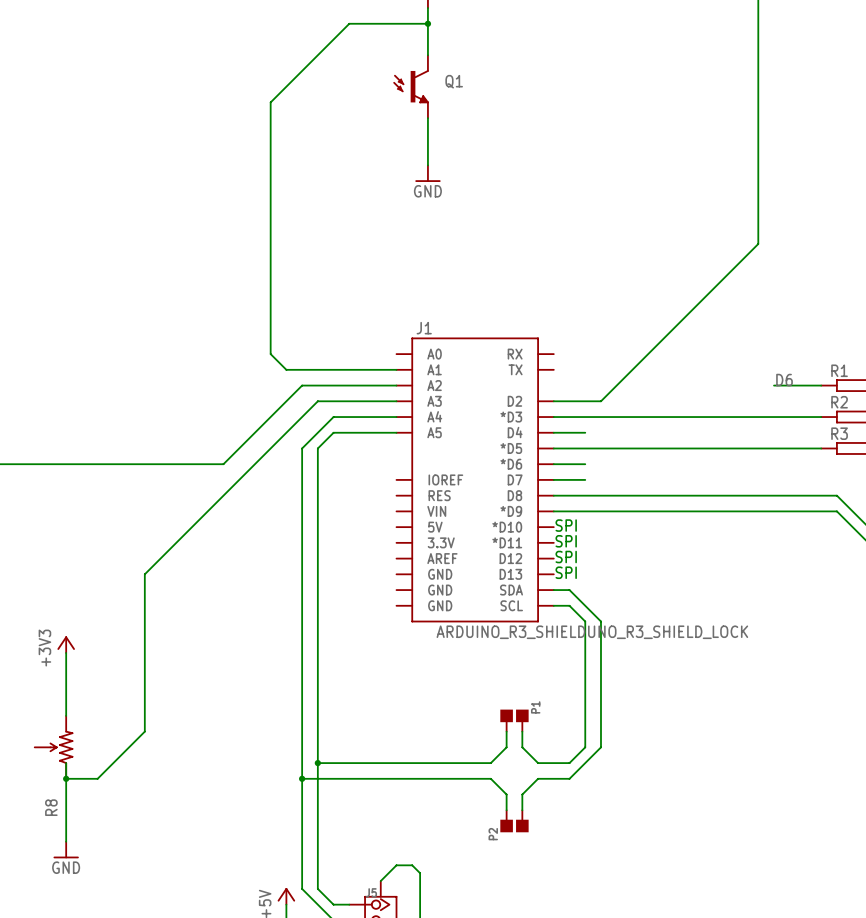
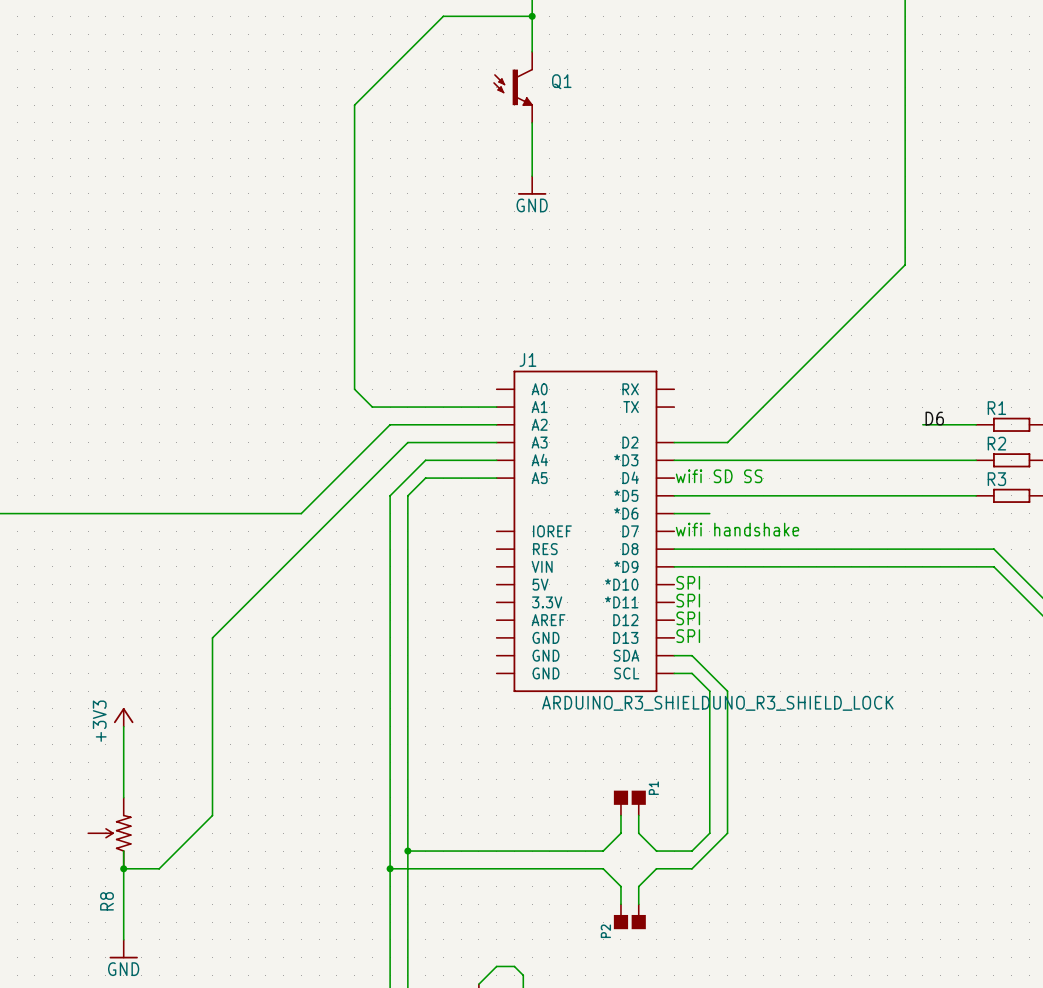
text: none -> wifi SD SS (719, 476)
wire: (553, 432) (585, 432) -> none
text: none -> wifi handshake (737, 529)
wire: (553, 479) (585, 479) -> none

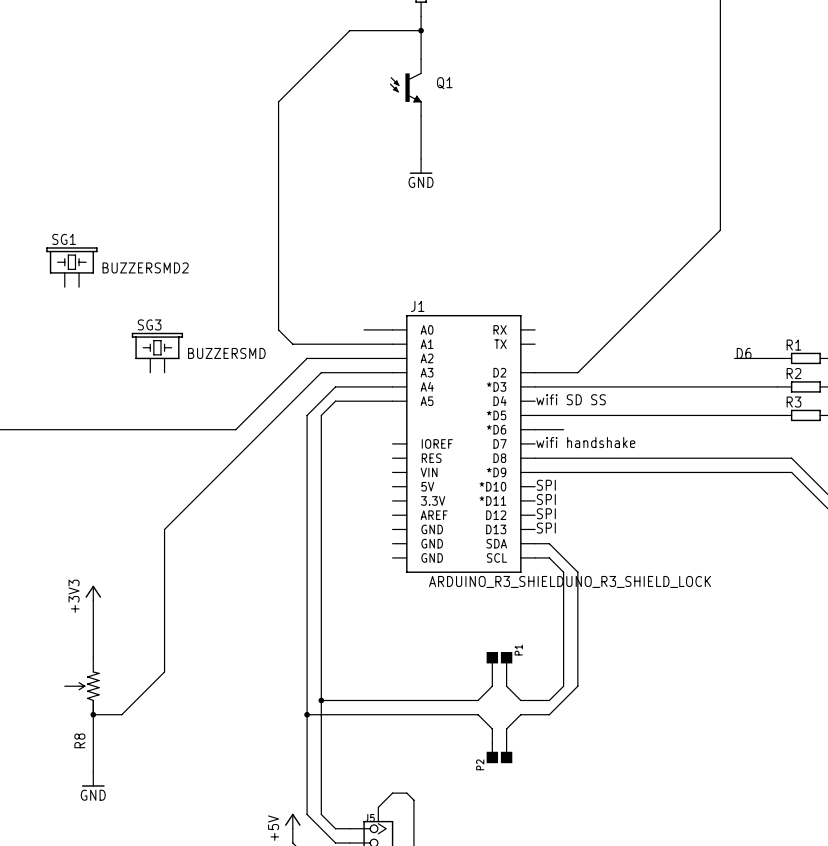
SG1: none -> BUZZERSMD2 (71, 267)
wire: none -> (364, 329) (392, 329)
SG3: none -> BUZZERSMD (157, 352)

